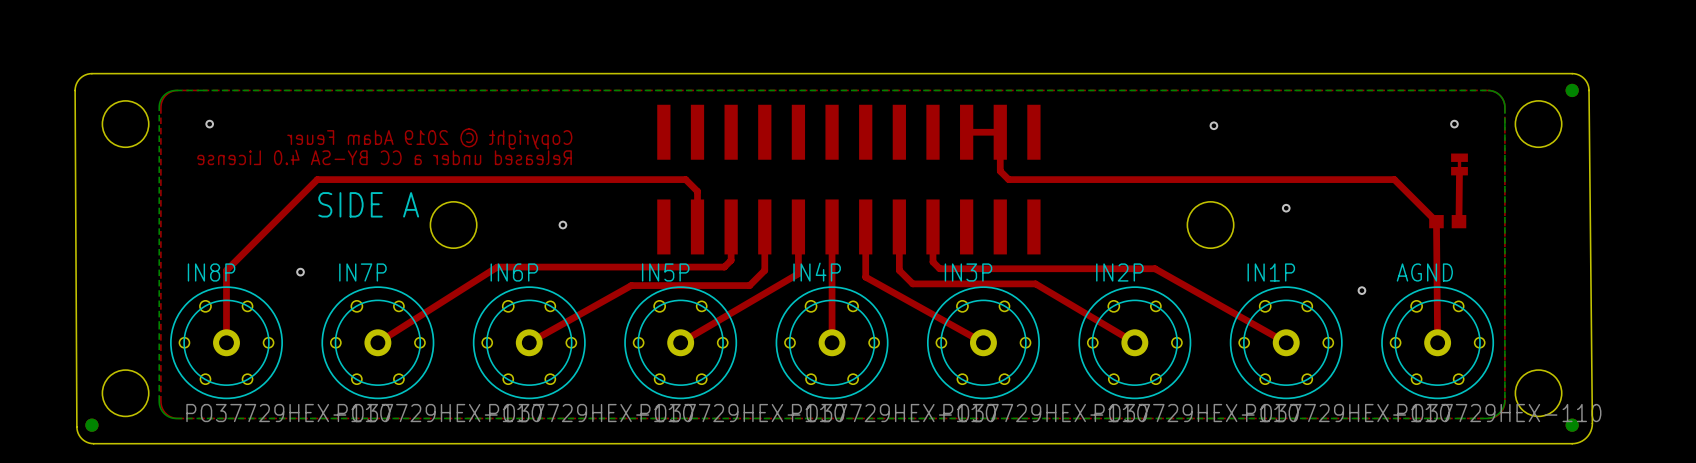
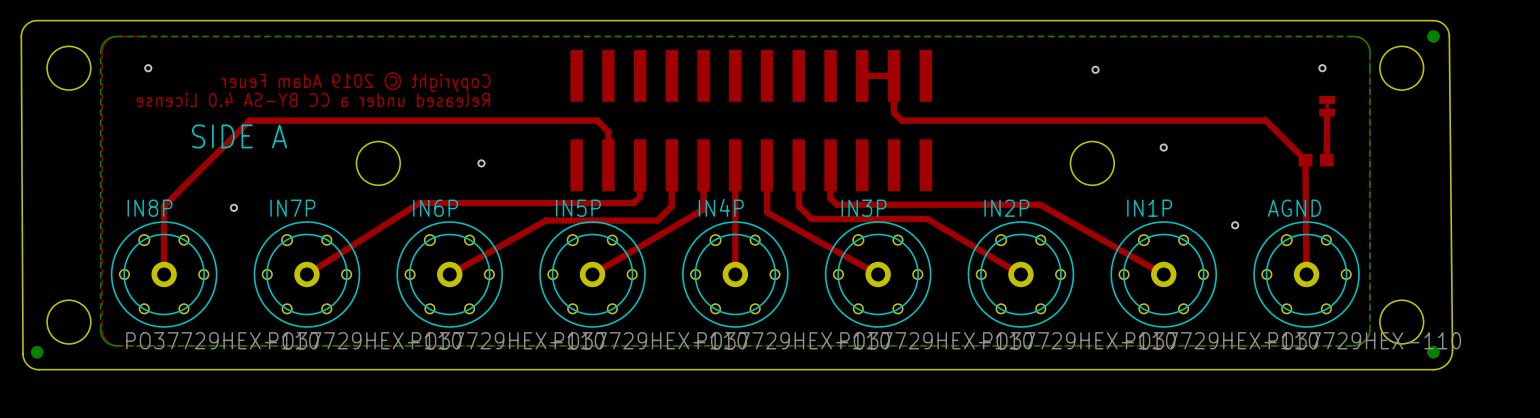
text position: SIDE A (368, 204) -> SIDE A (239, 136)

